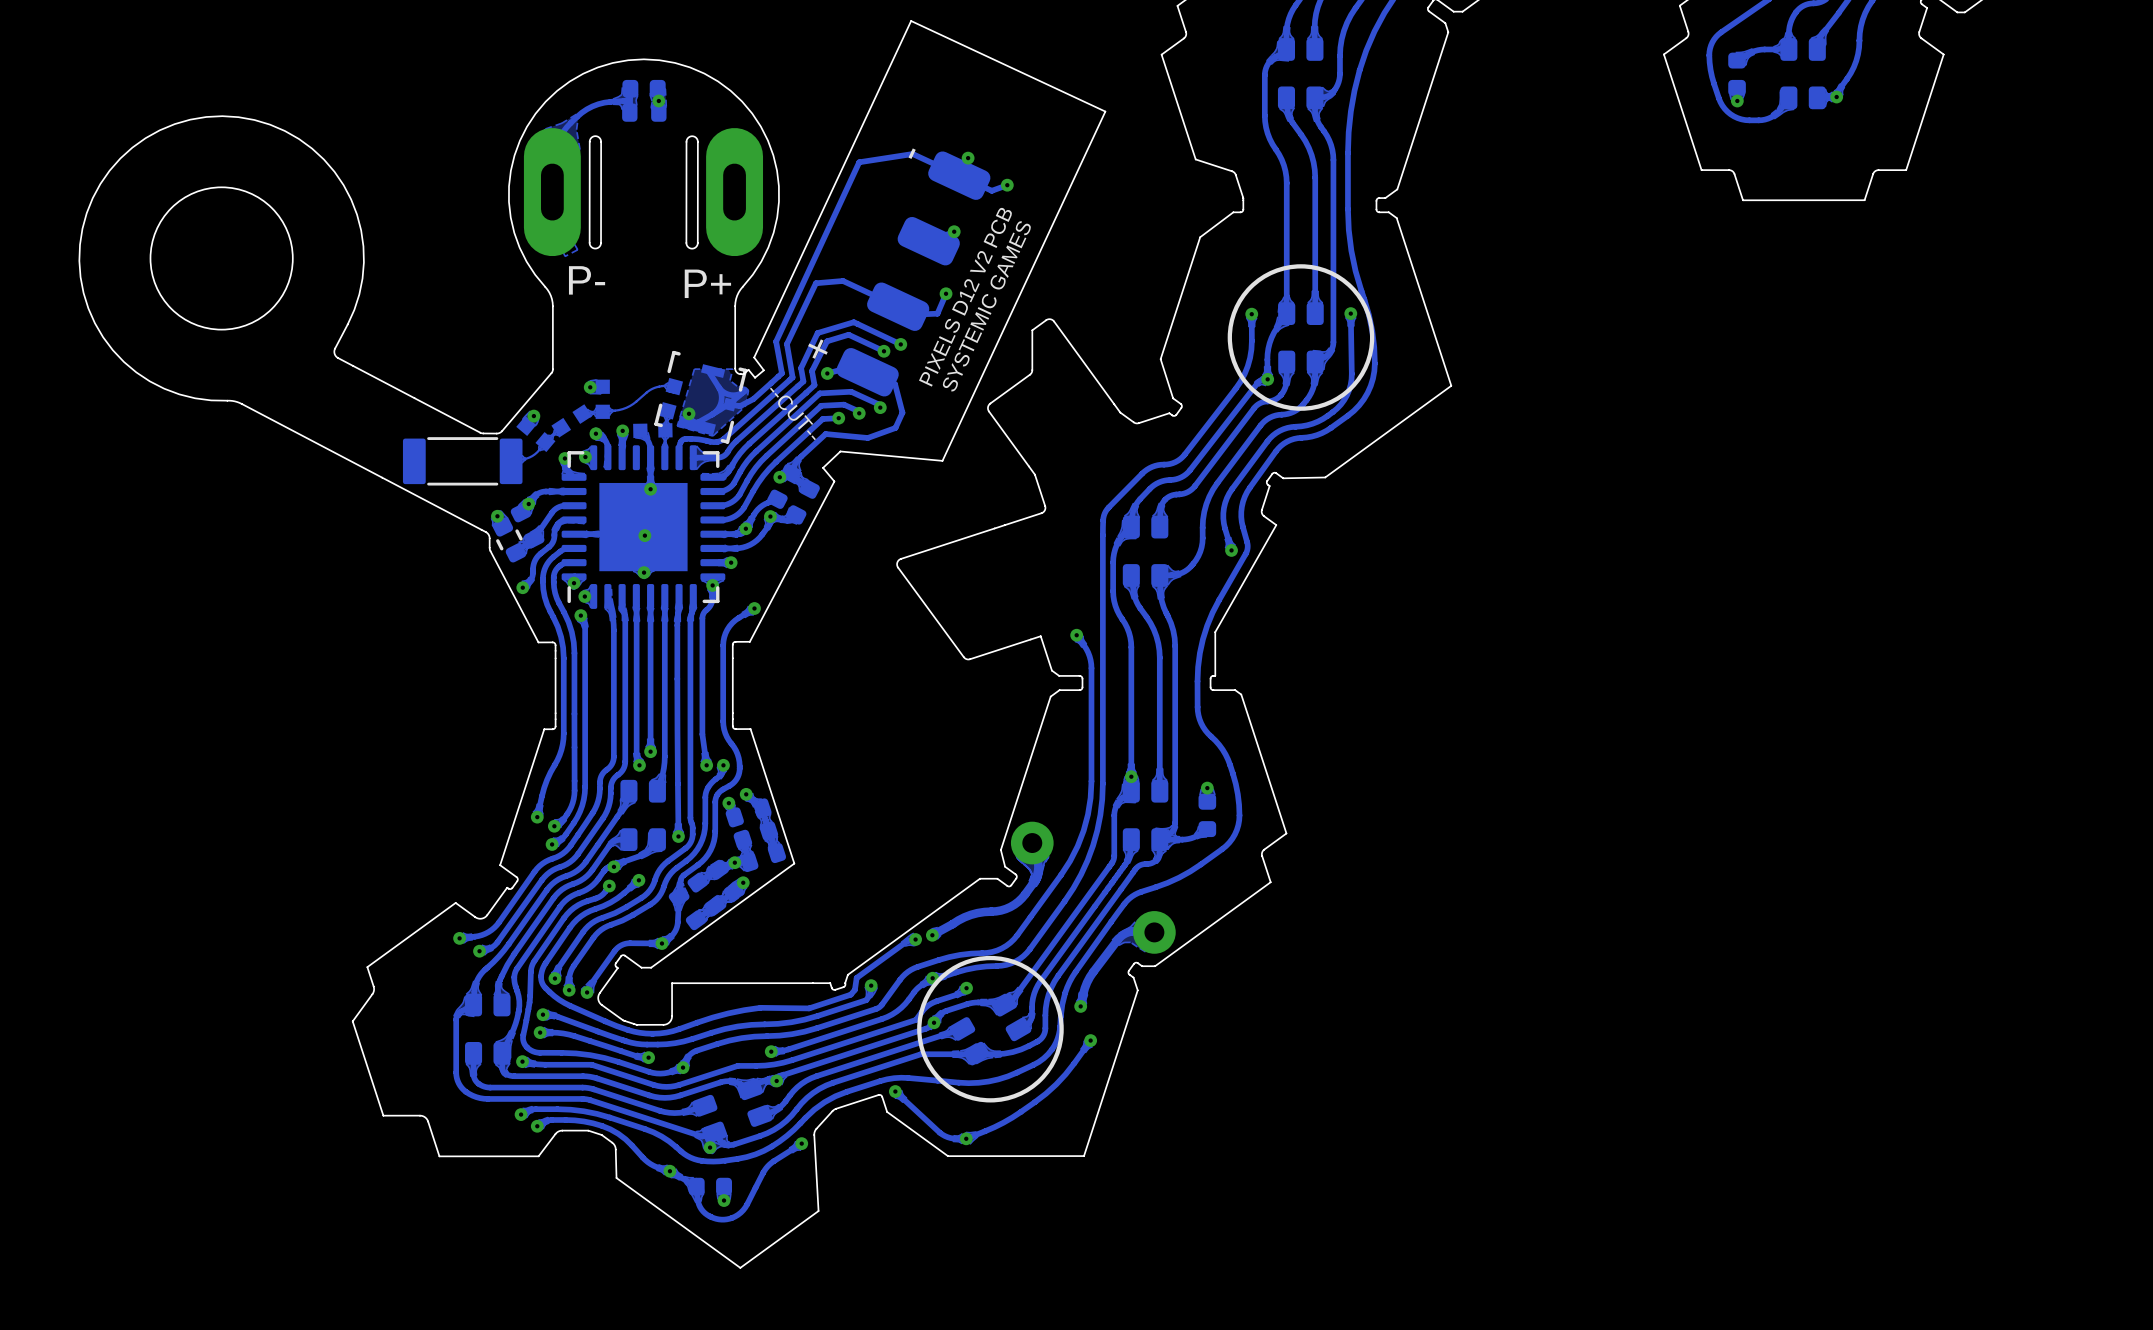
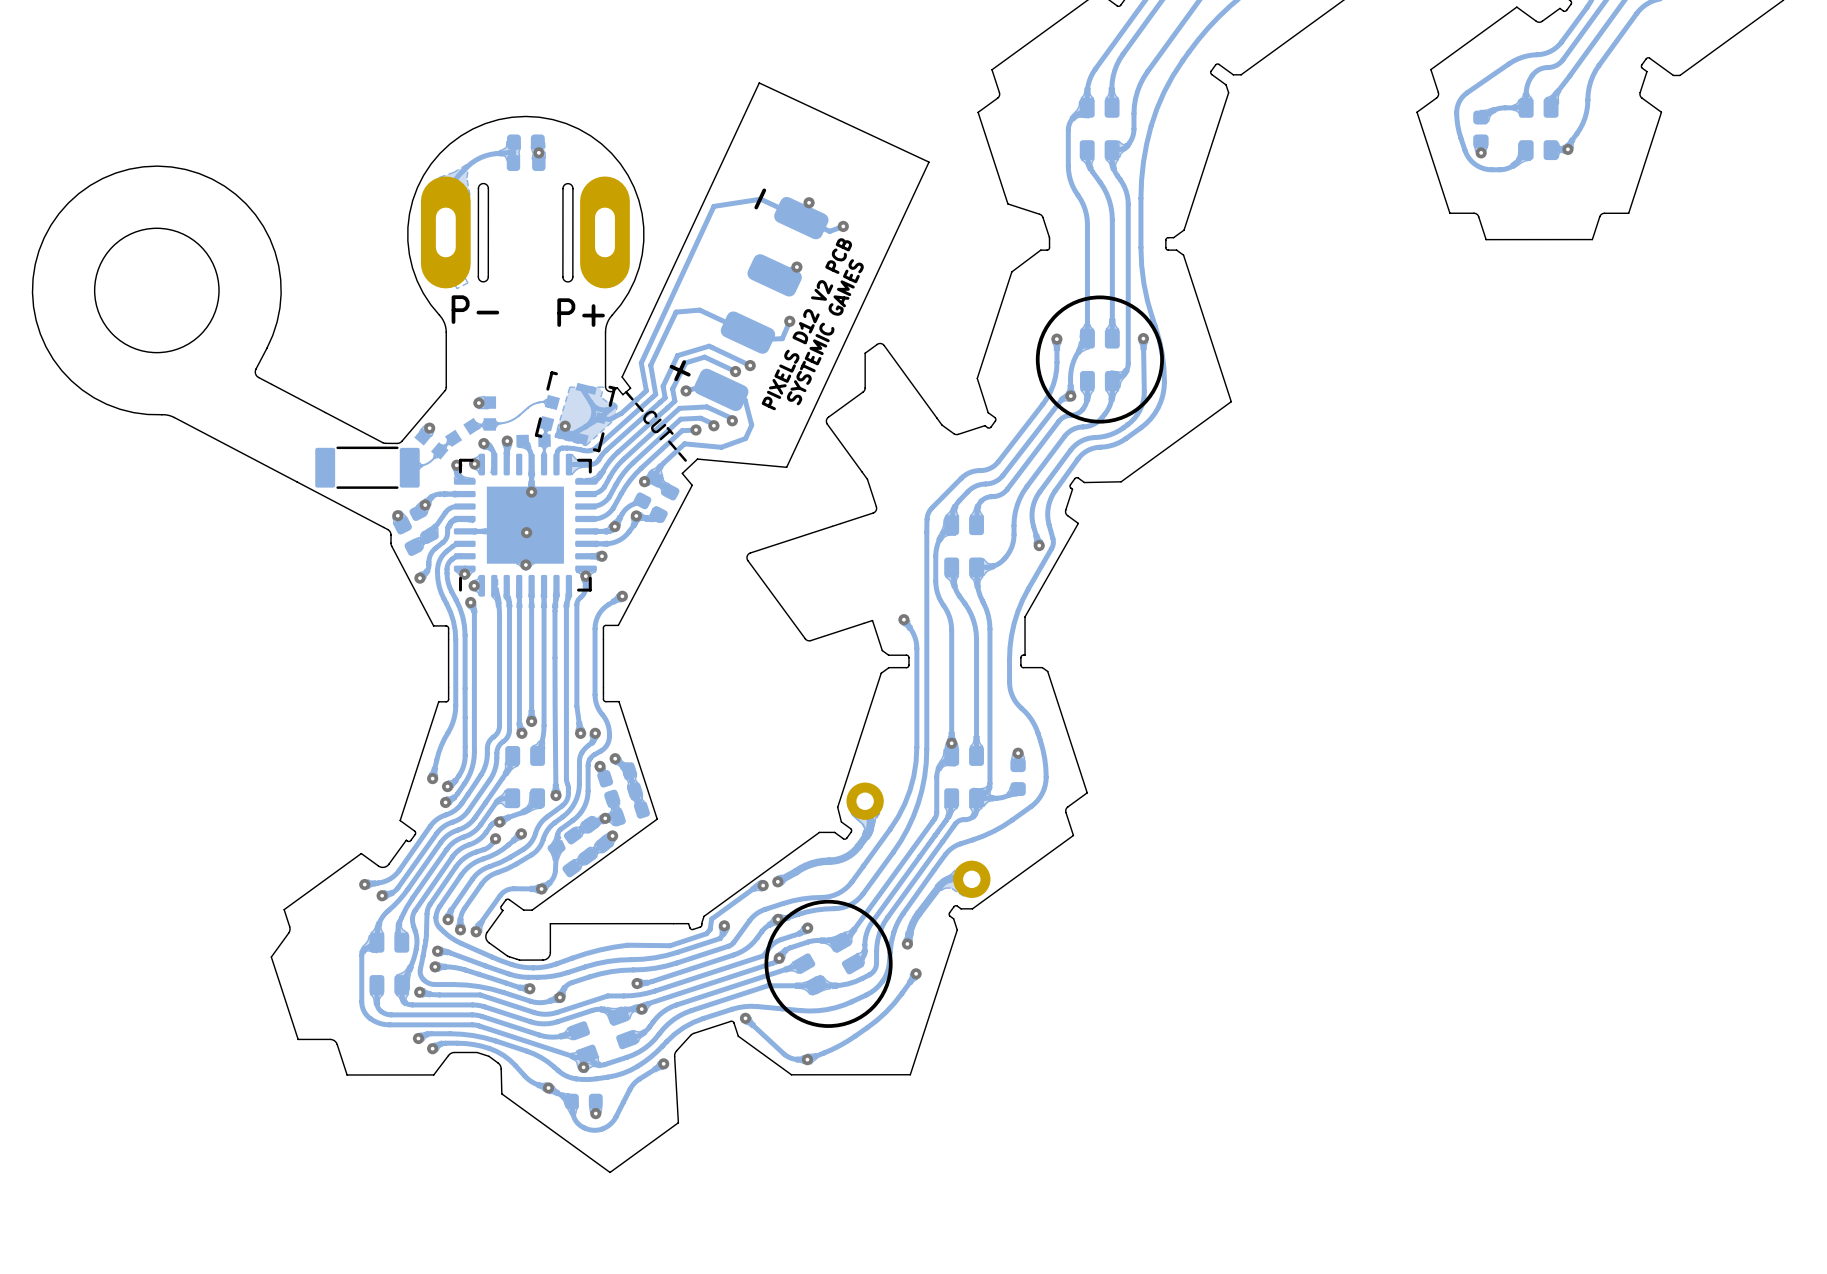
part footprint: [492, 517, 527, 563] -> [393, 516, 423, 556]

